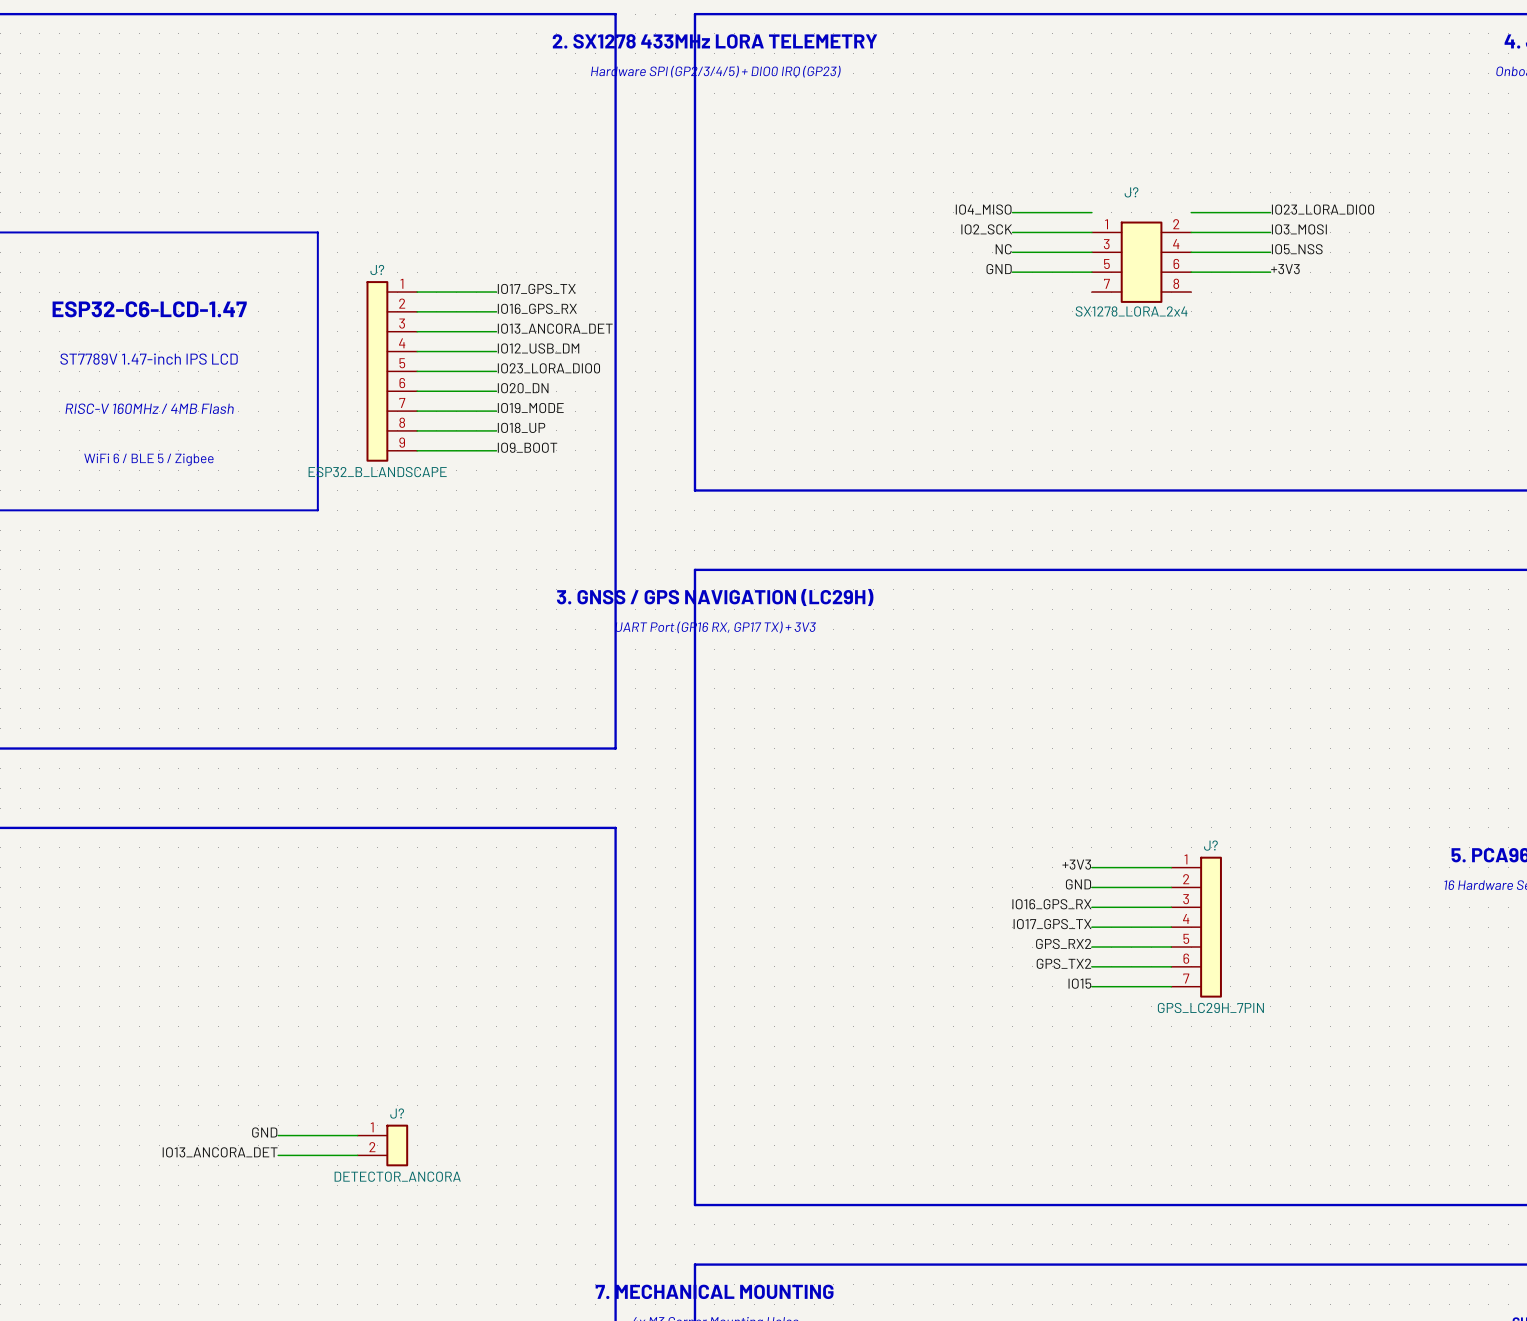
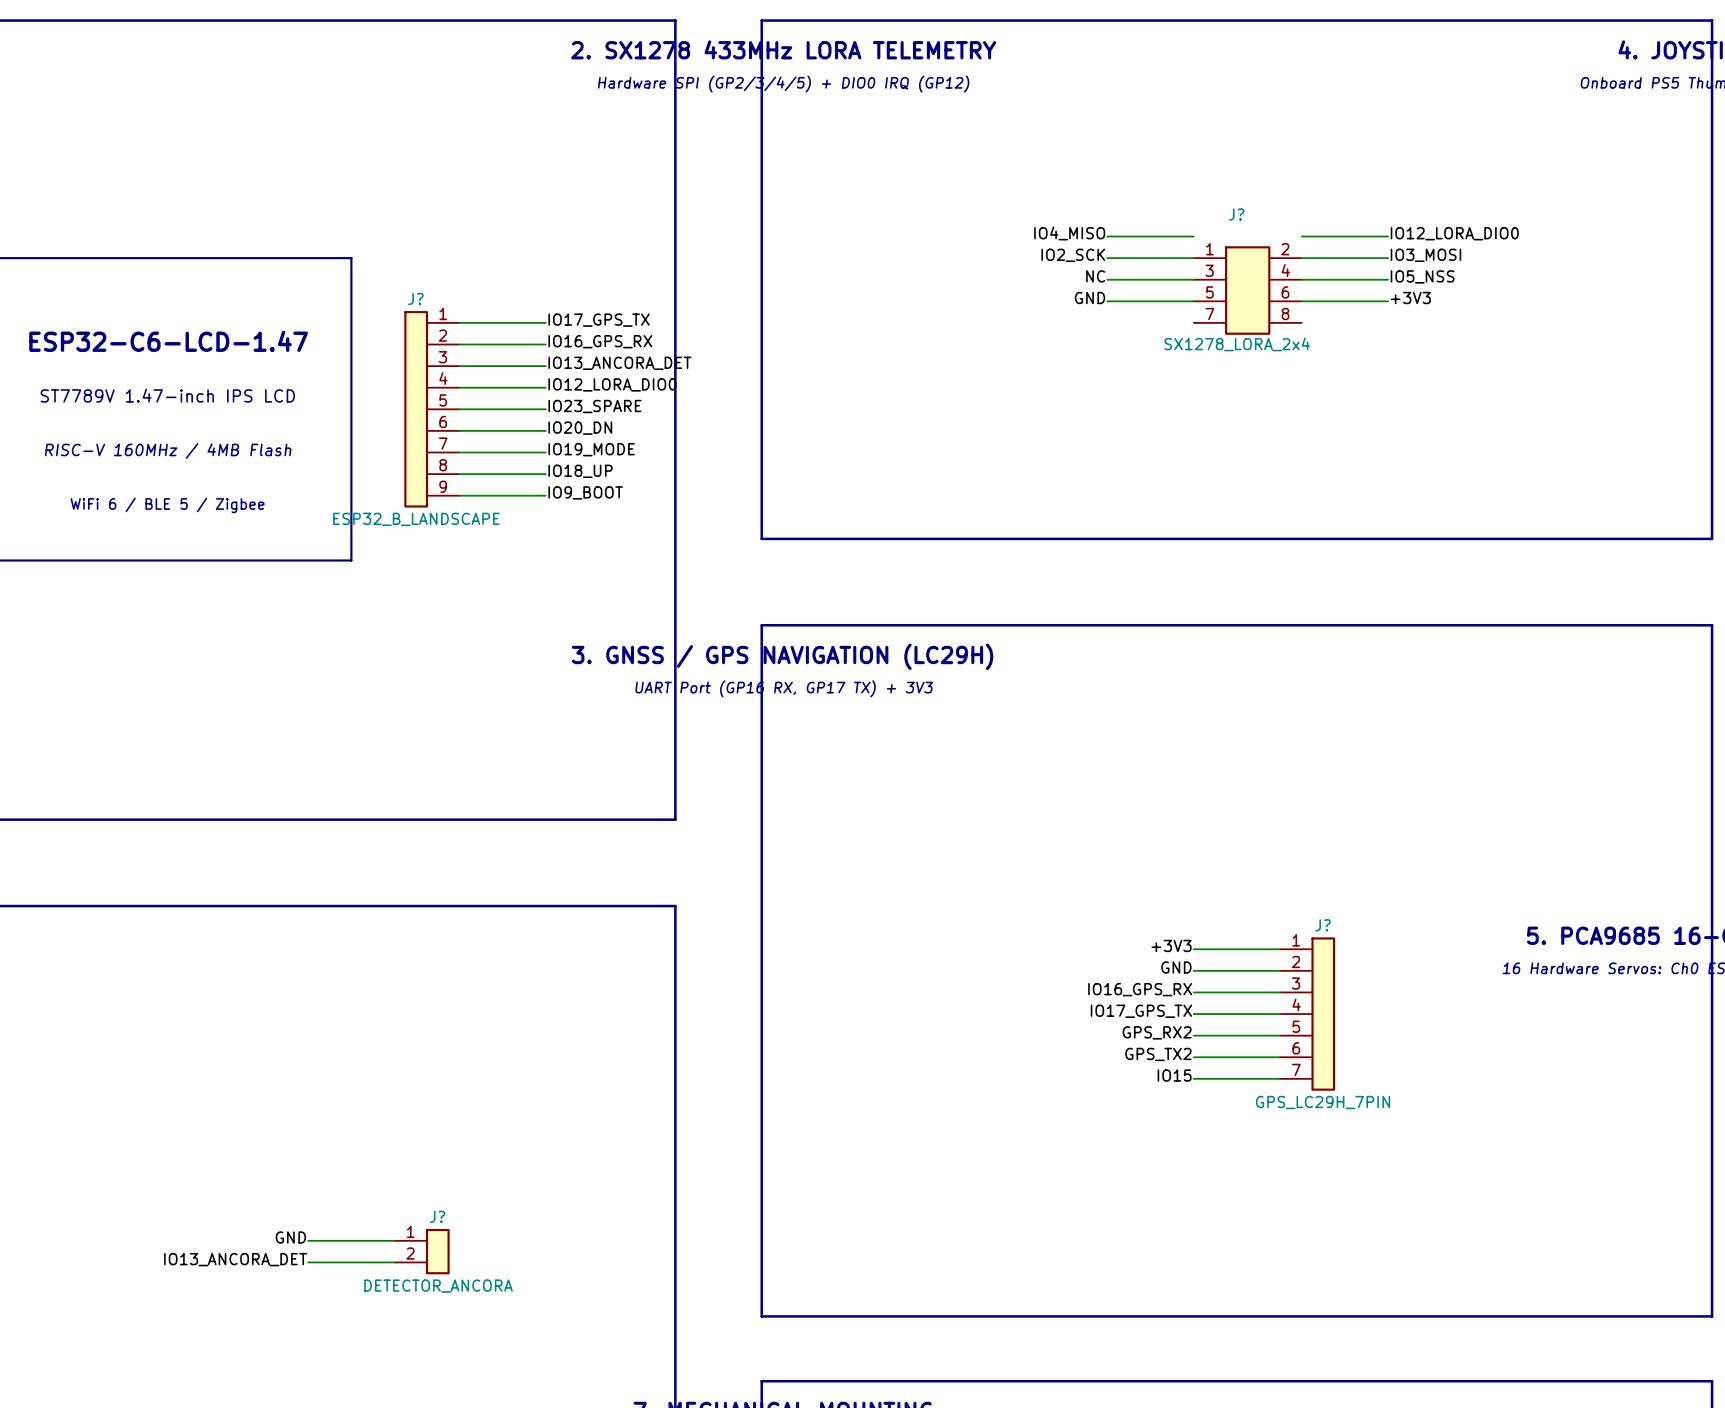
text: Hardware SPI (GP2/3/4/5) + DIO0 IRQ (GP23) (715, 71) -> Hardware SPI (GP2/3/4/5) + DIO0 IRQ (GP12) (783, 84)
label: IO23_LORA_DIO0 (1323, 209) -> IO12_LORA_DIO0 (1454, 233)
label: IO12_USB_DM (538, 348) -> IO12_LORA_DIO0 (612, 384)
label: IO23_LORA_DIO0 (548, 368) -> IO23_SPARE (594, 406)

